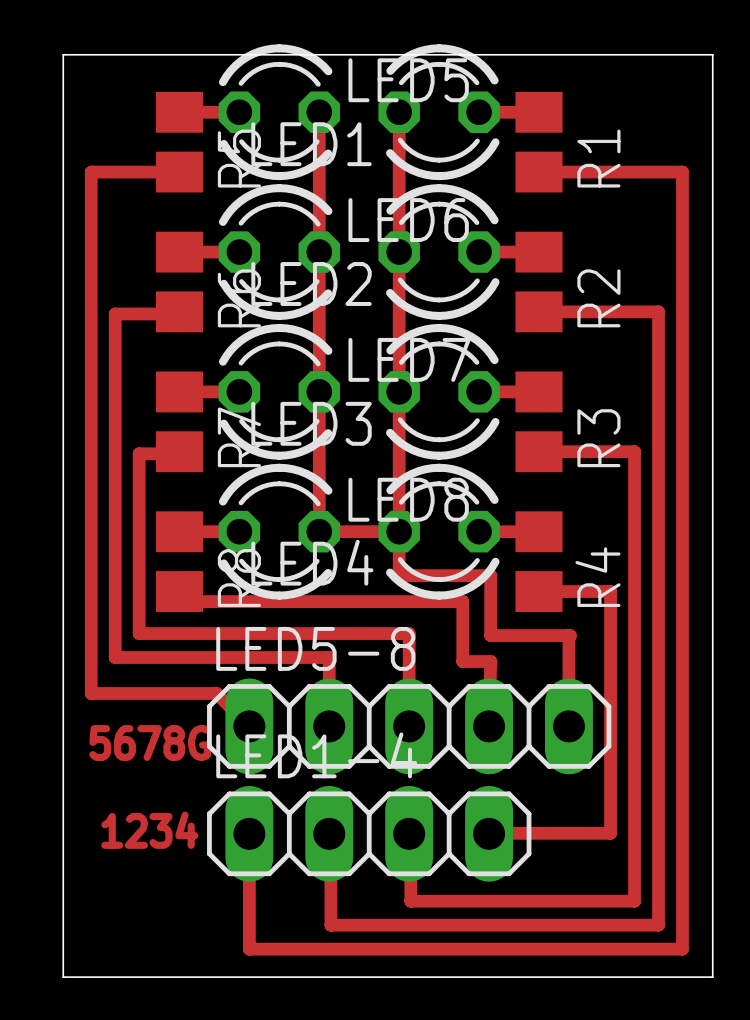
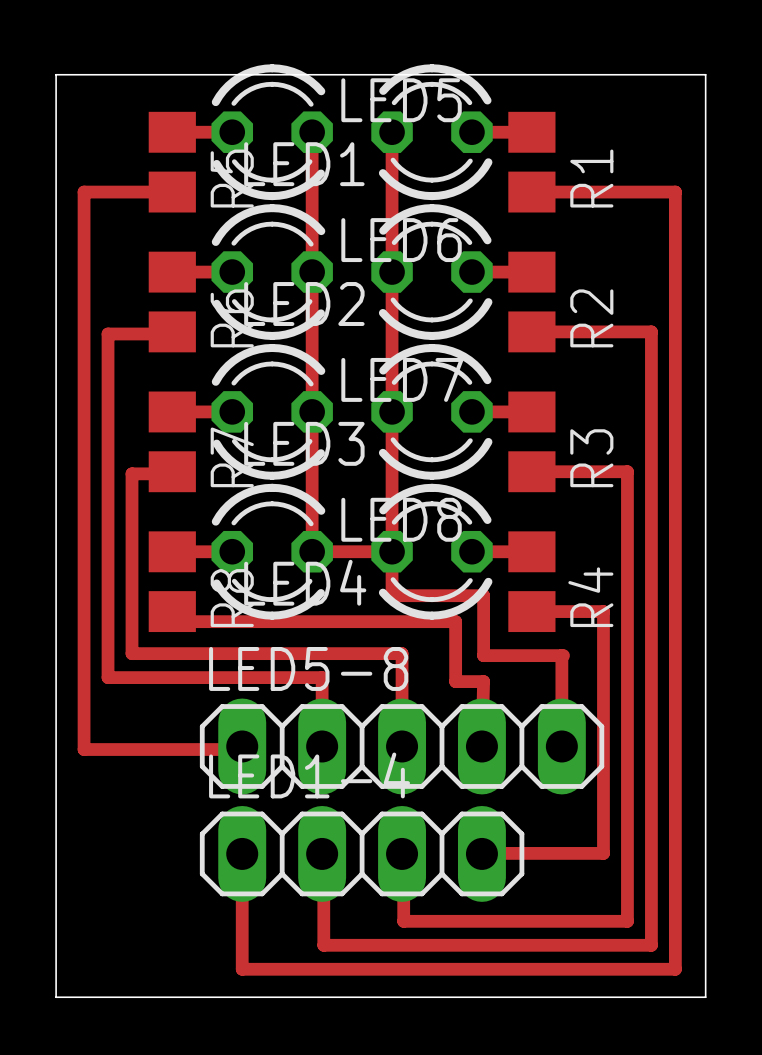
track: (91, 693) (216, 693) (249, 726) -> (84, 713) (84, 749) (242, 749) (242, 746)
text: 5678G (150, 743) -> none
text: 1234 (149, 830) -> none

